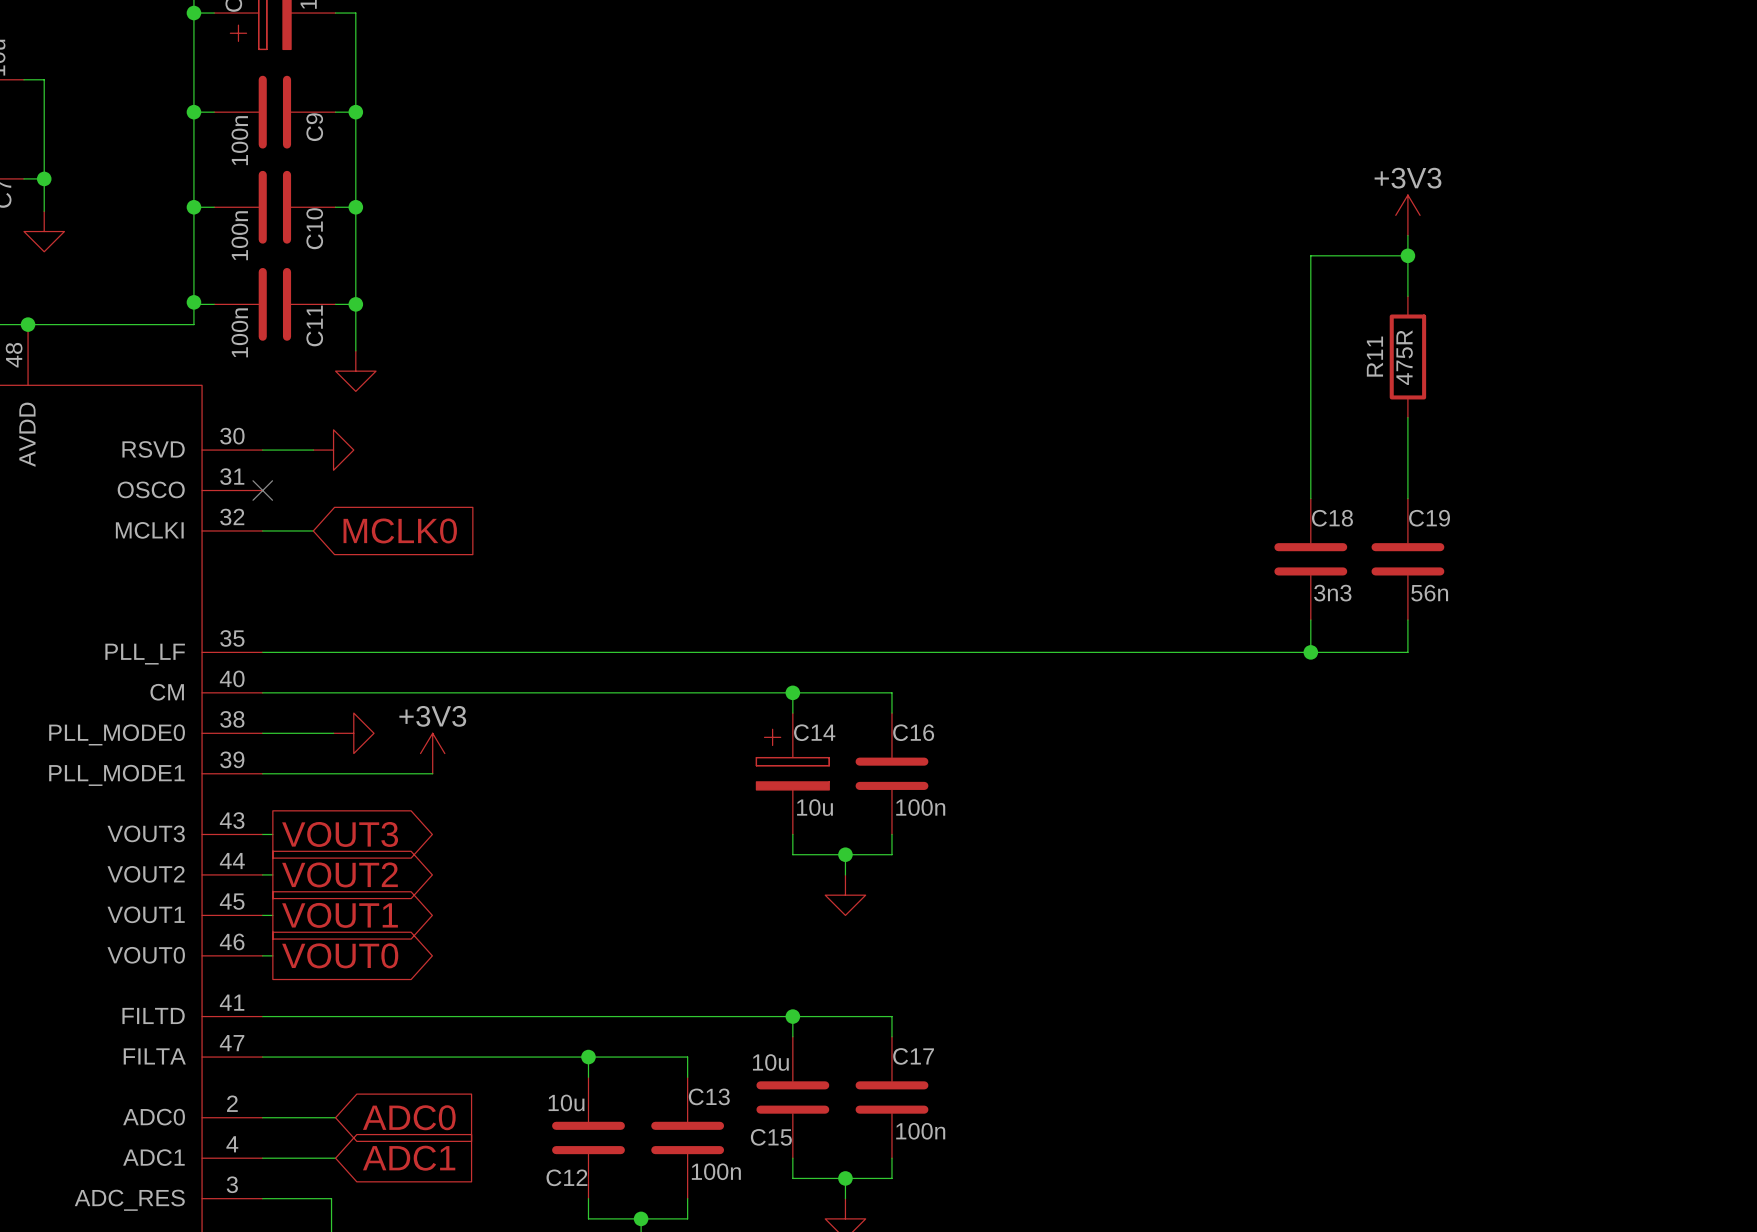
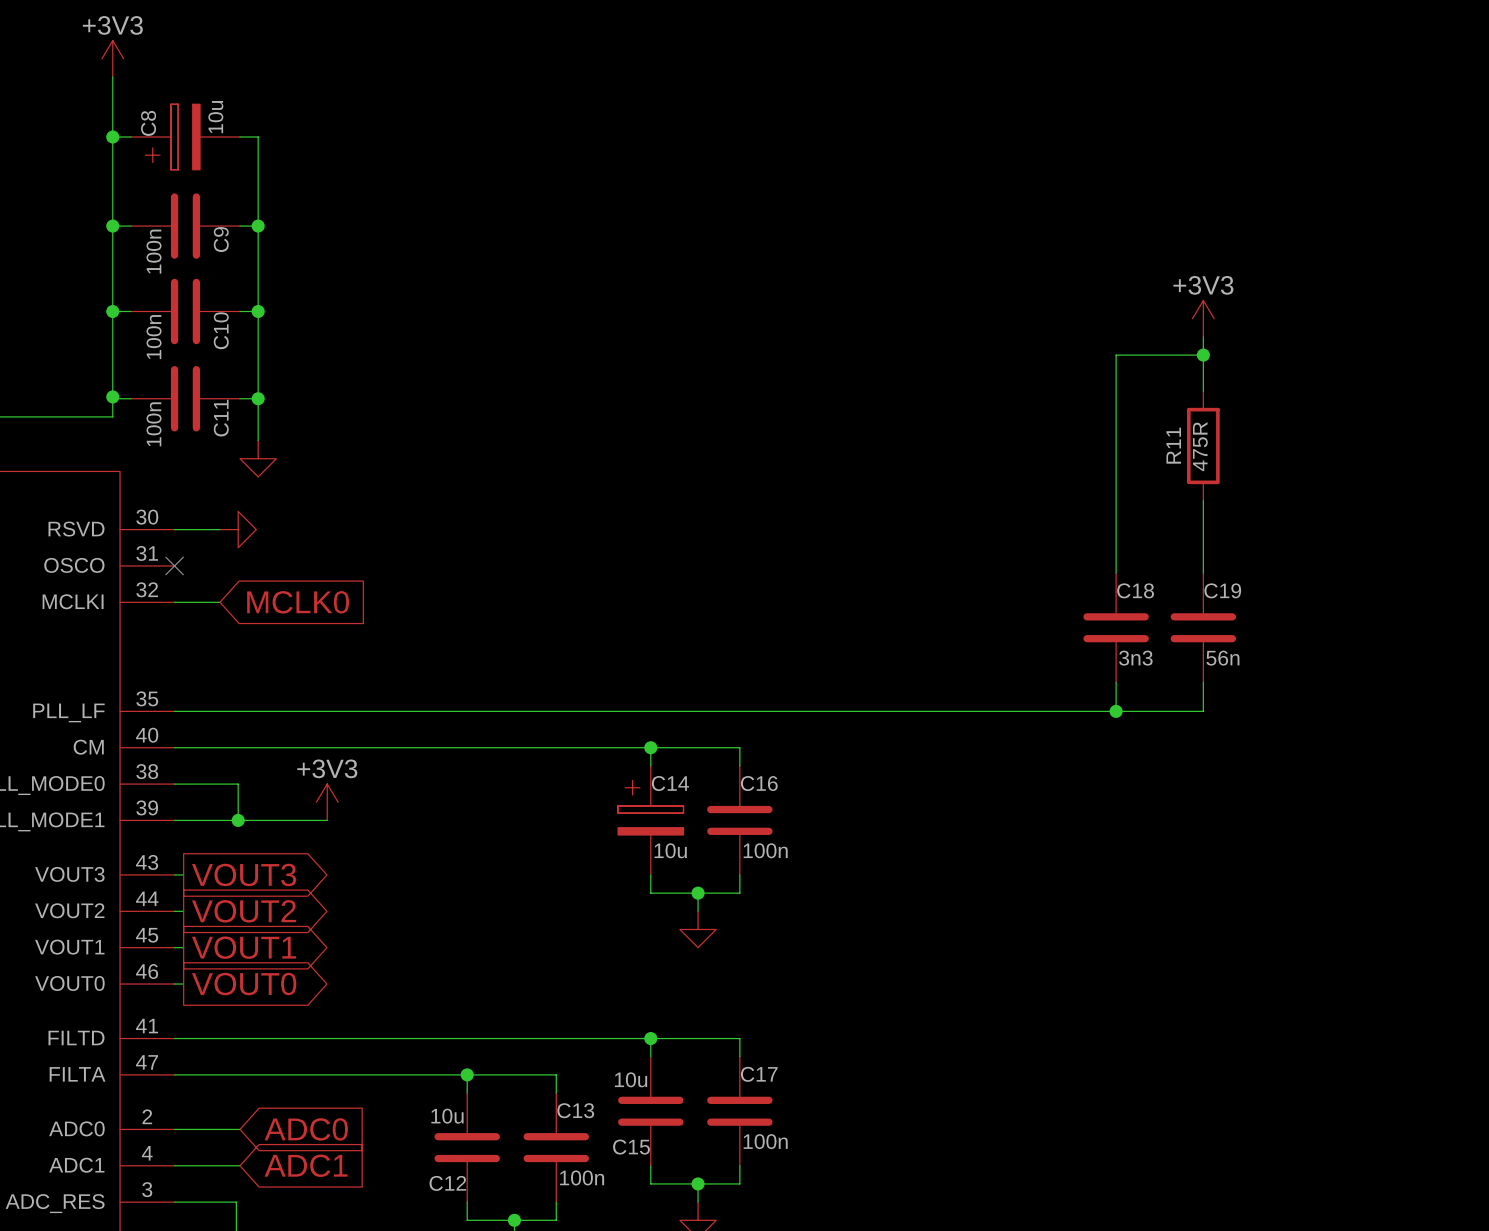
wire: none -> (238, 784) (238, 820)
power symbol: (353, 733) -> none
junction: none -> (238, 820)

